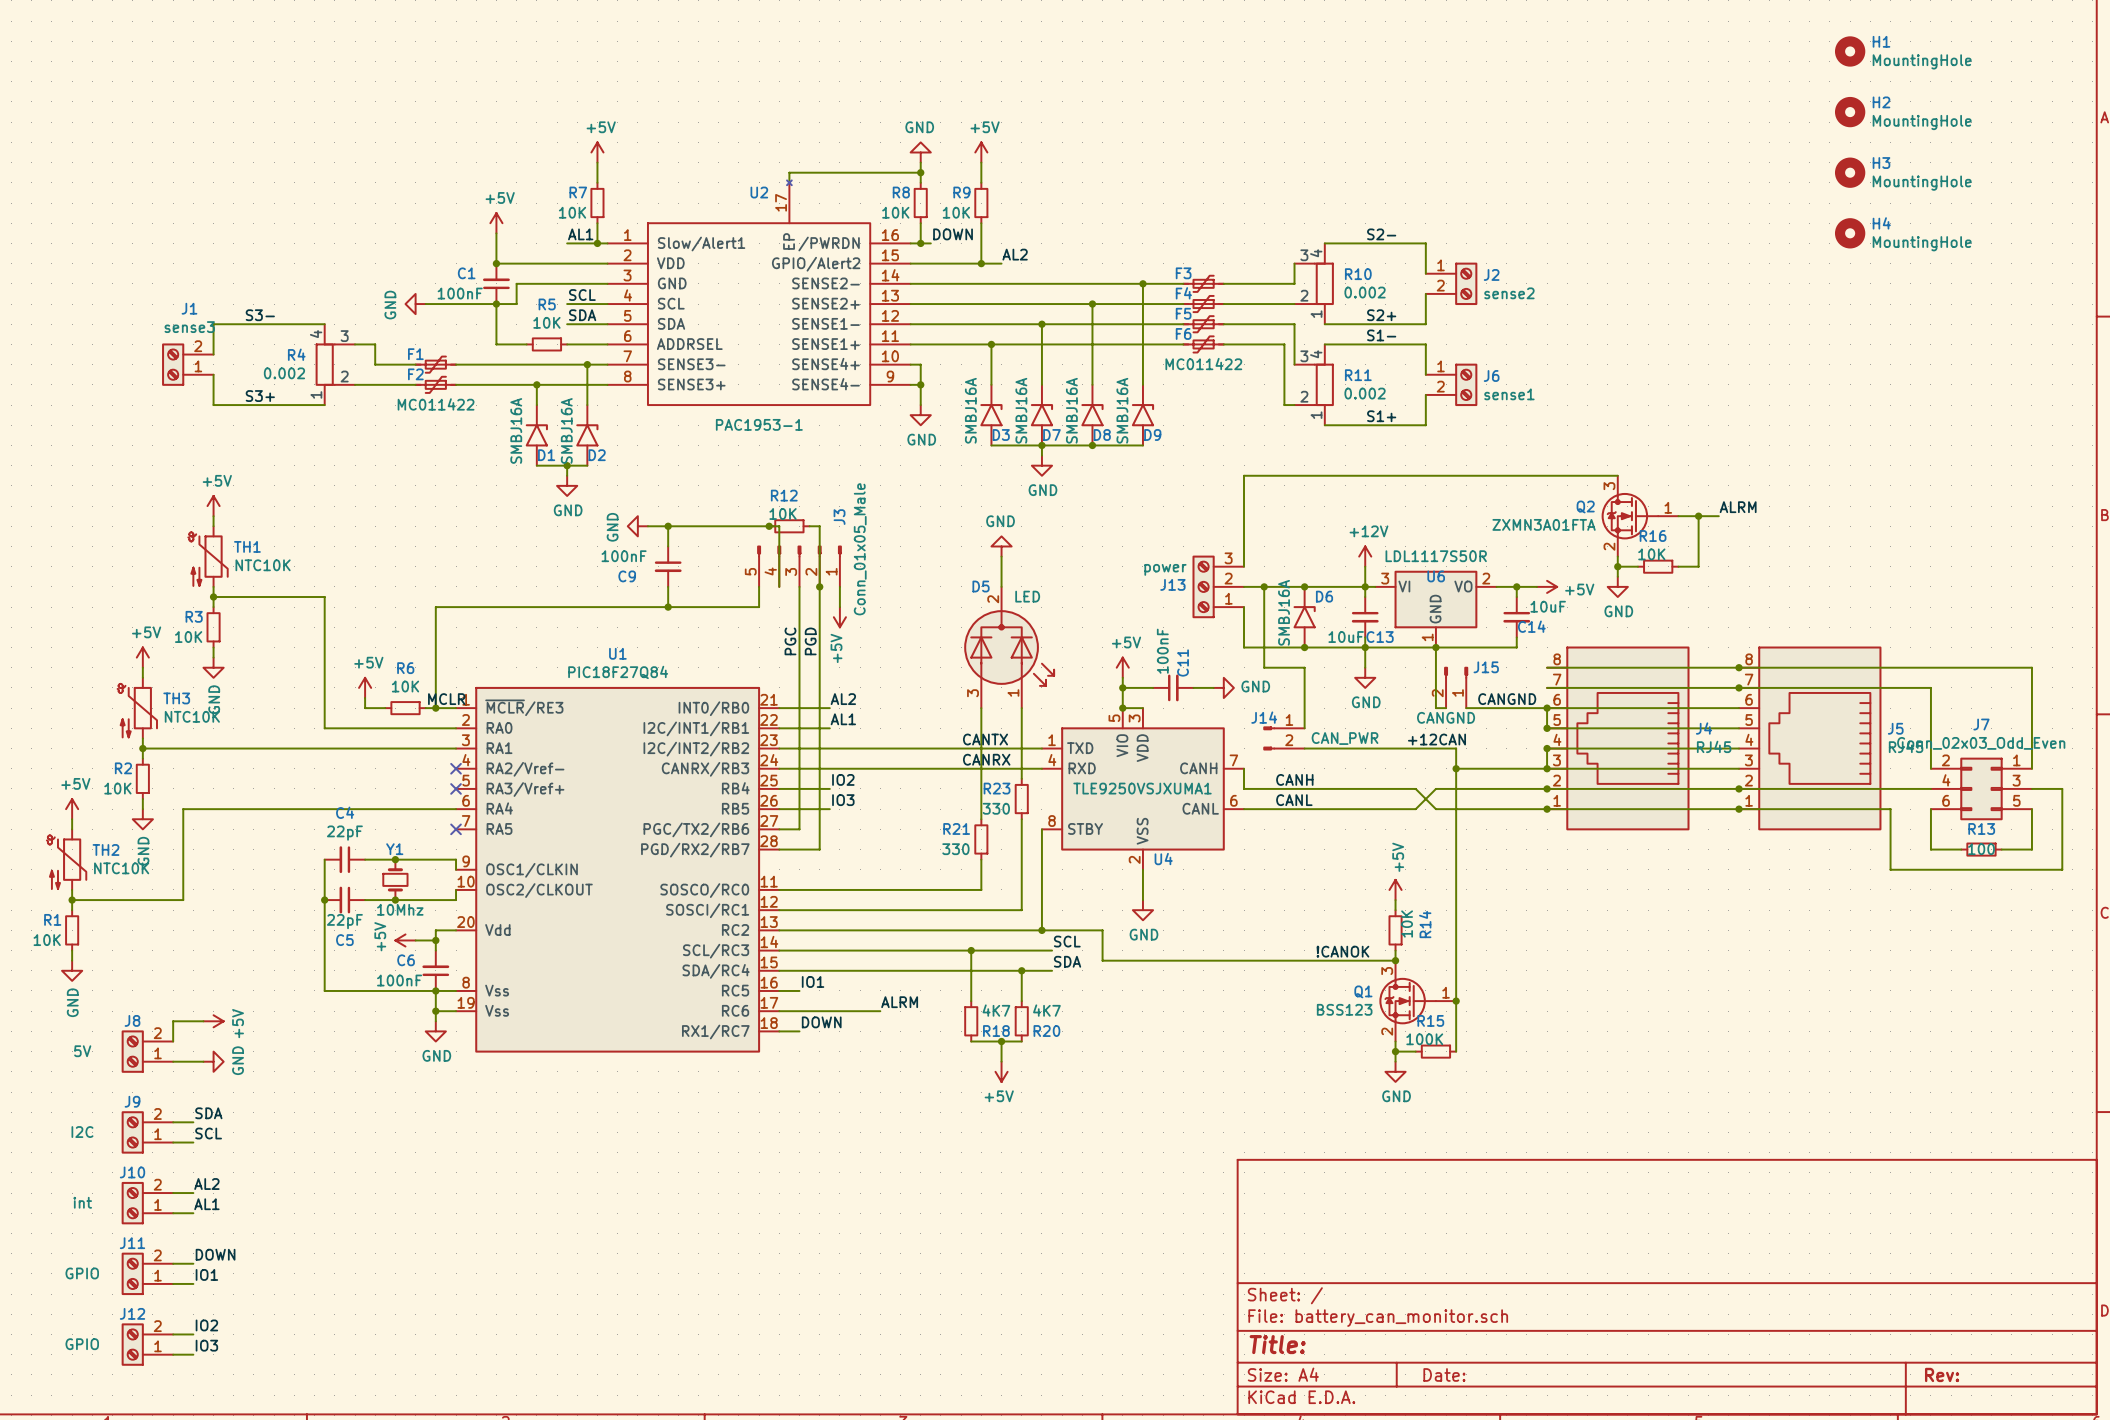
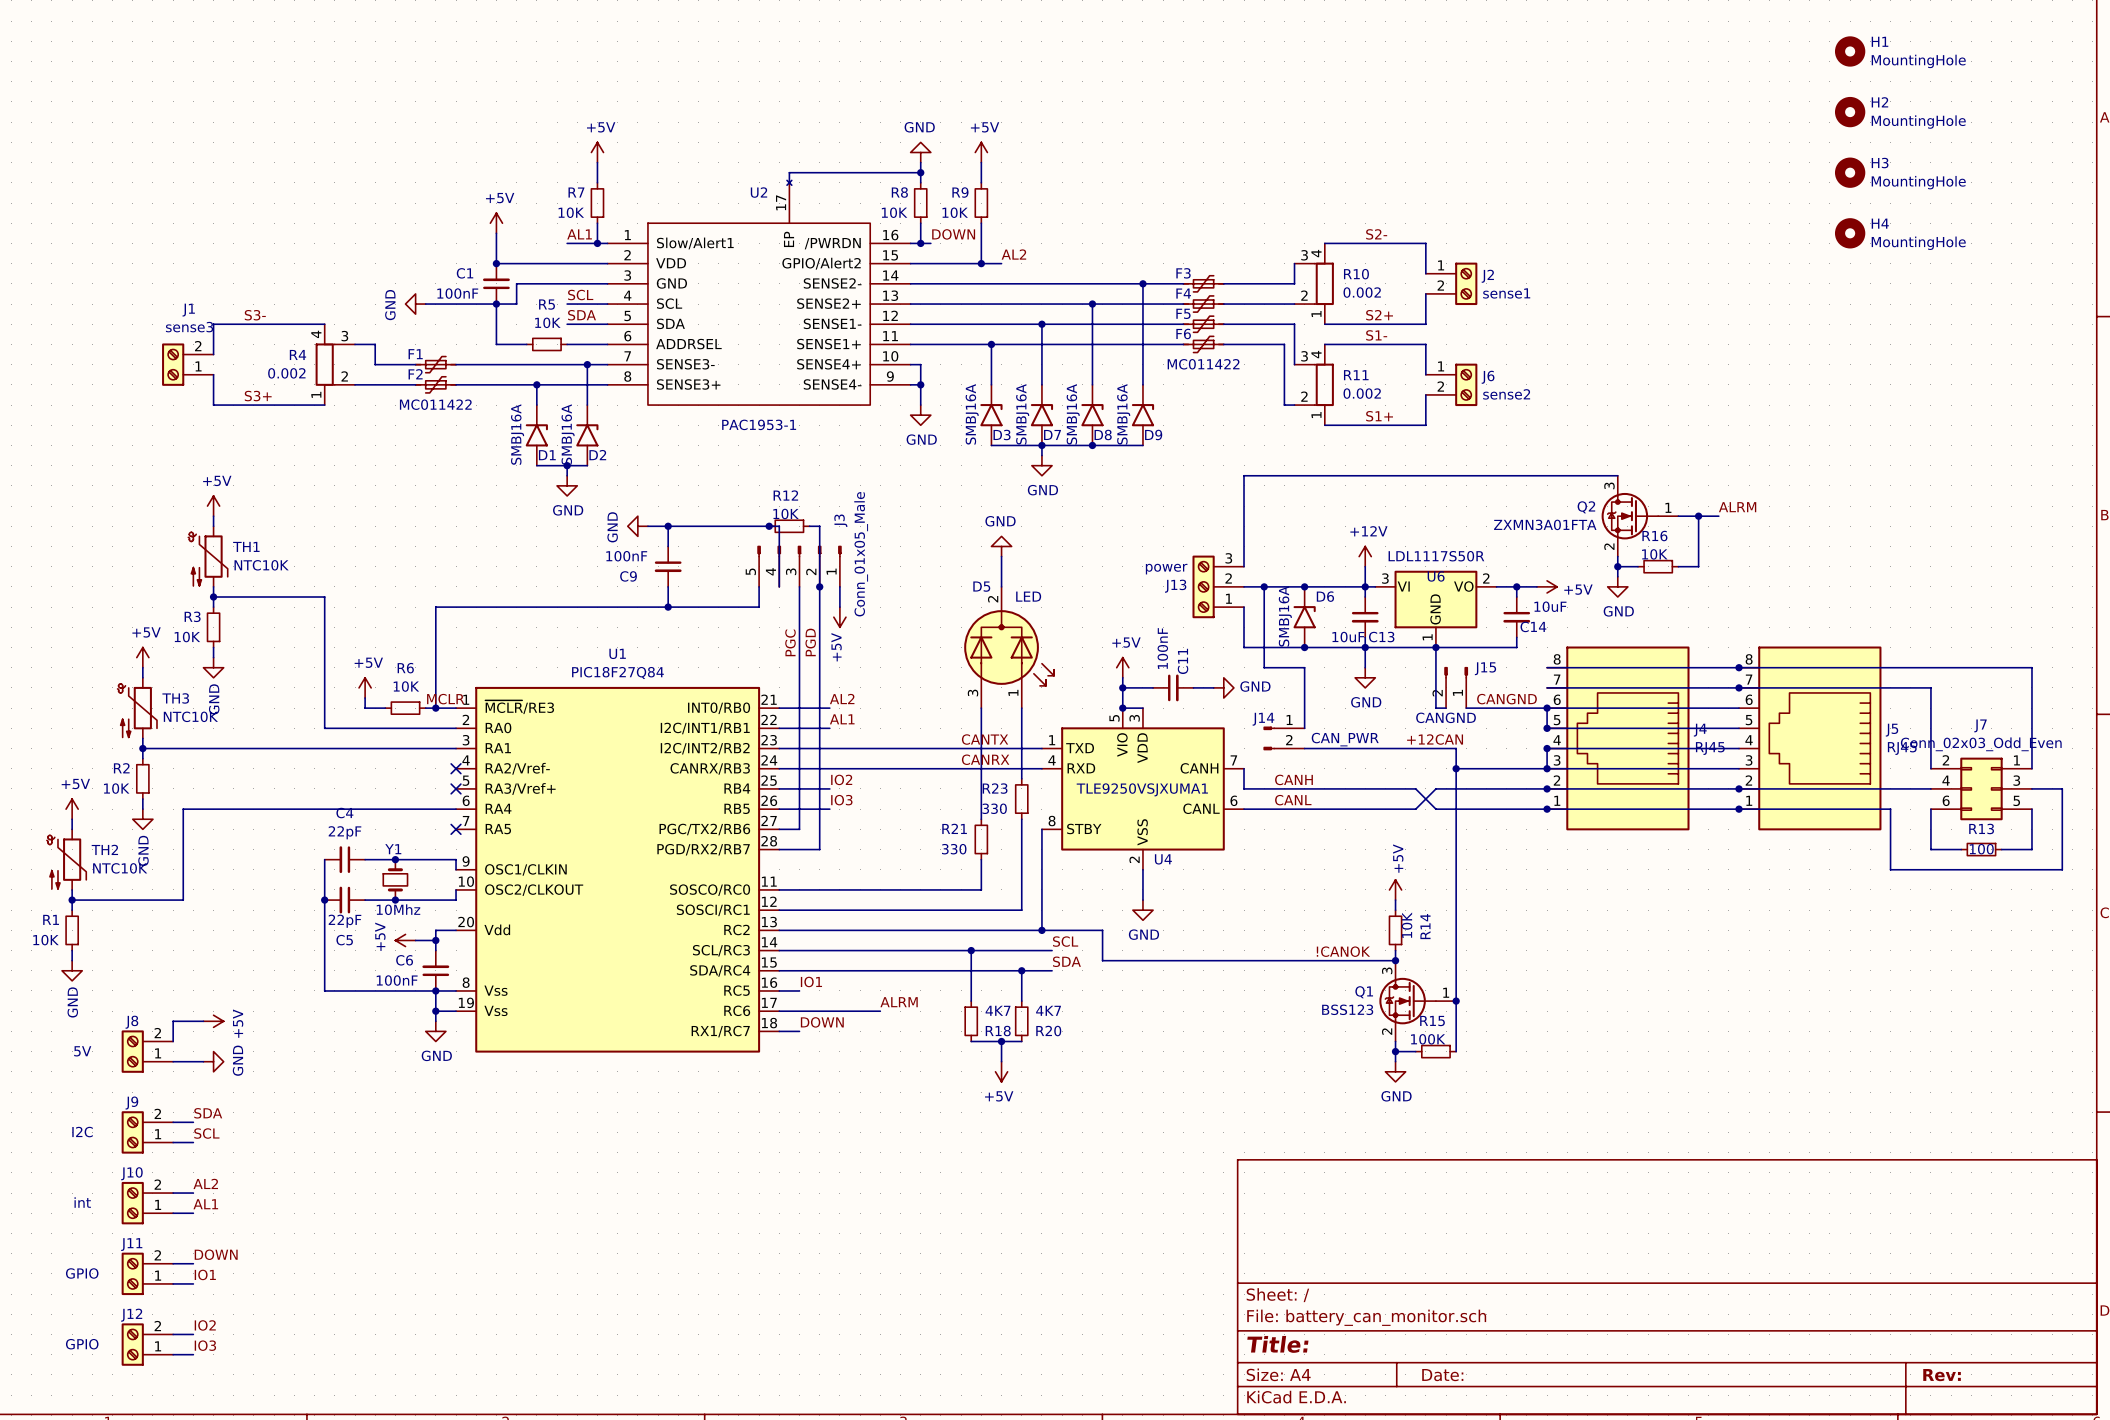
J2 value: sense2 (1509, 293) -> sense1 (1506, 293)
J6 value: sense1 (1509, 394) -> sense2 (1506, 394)

